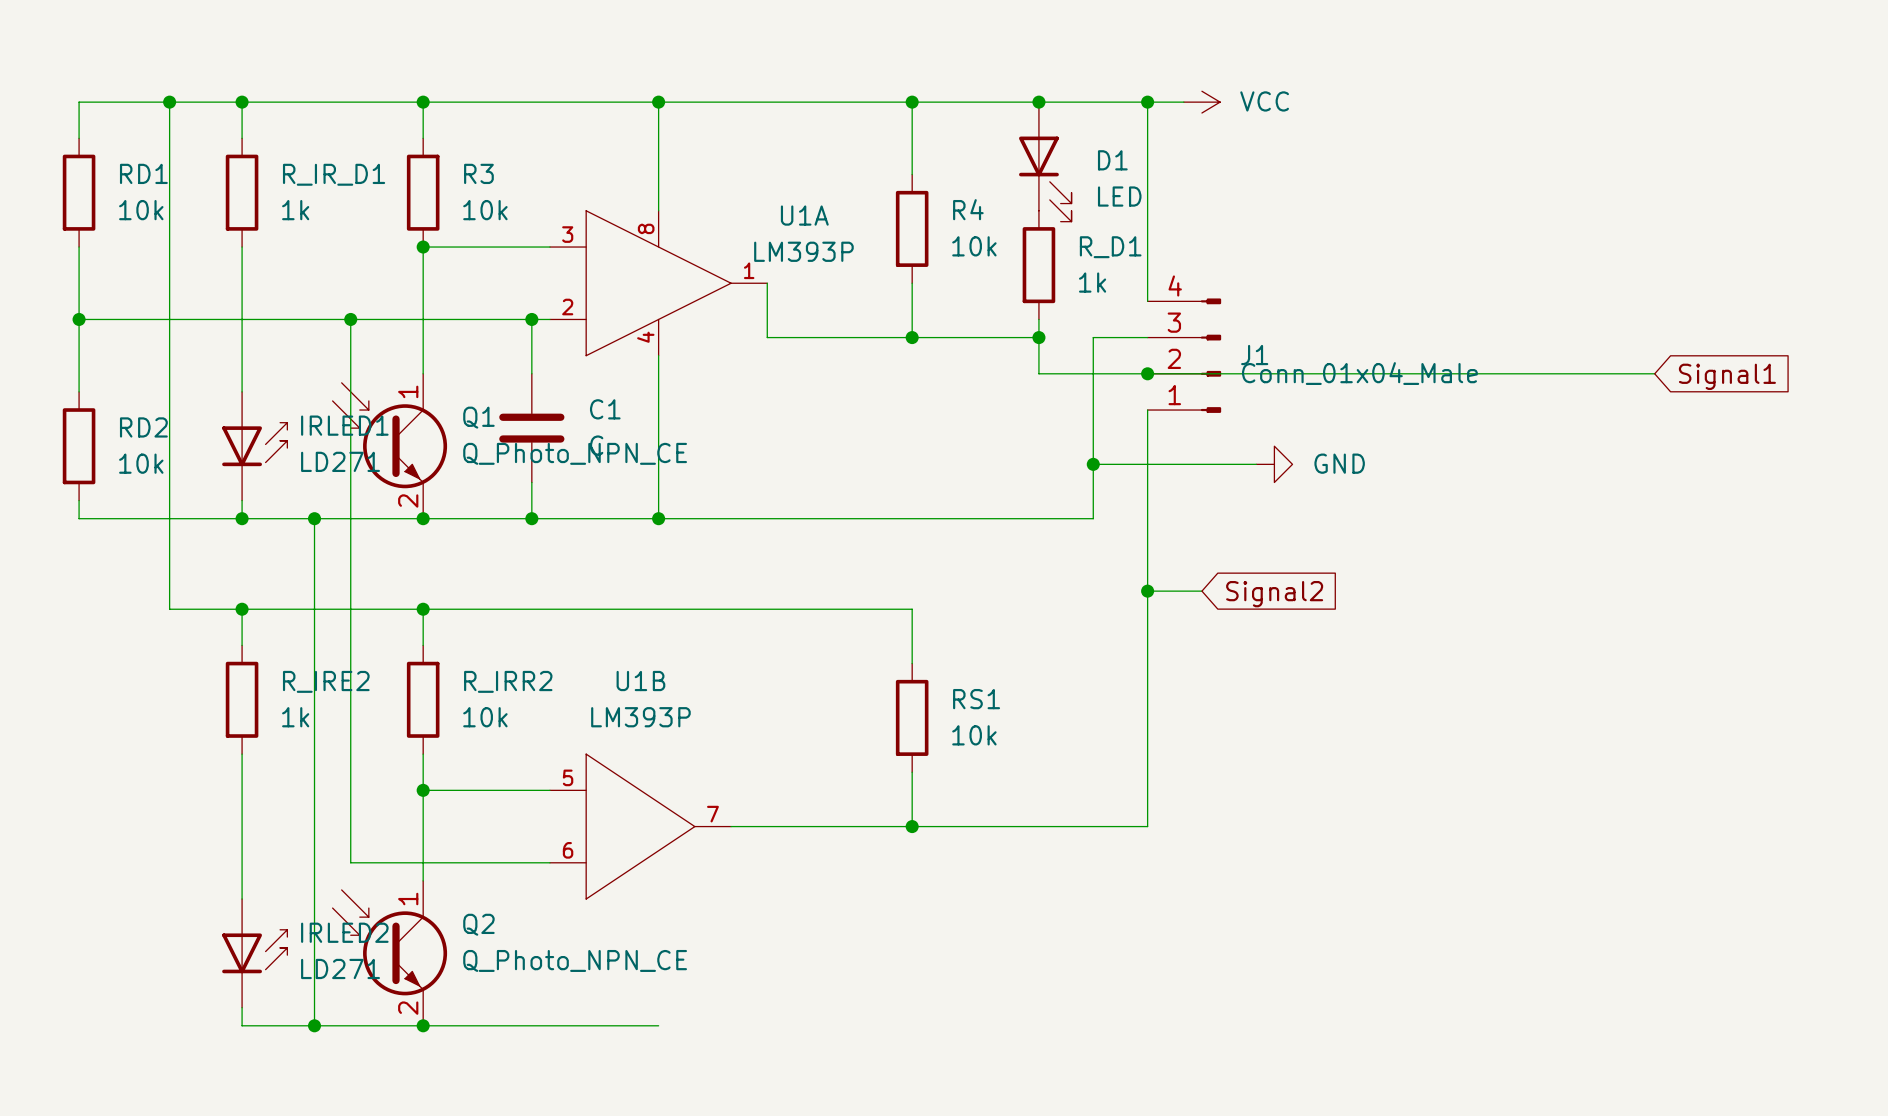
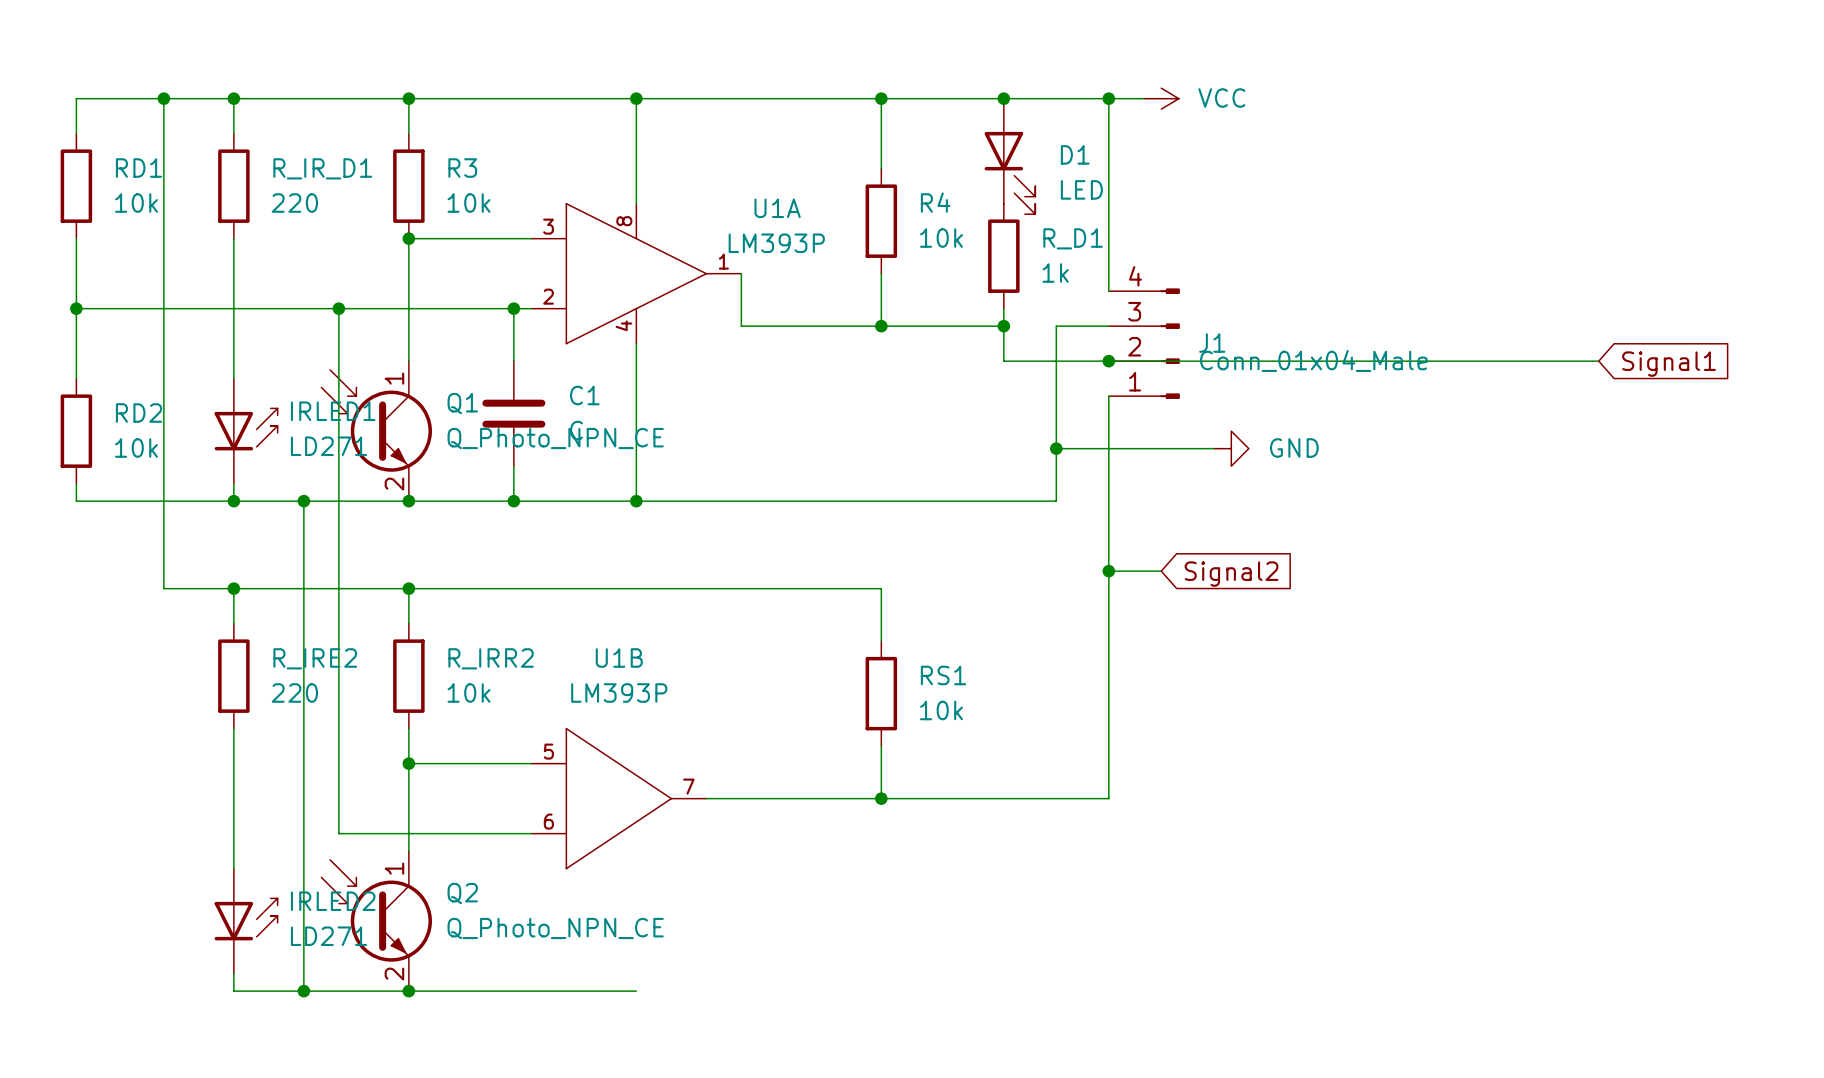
R_IR_D1 value: 1k (295, 210) -> 220 (294, 203)
R_IRE2 value: 1k (295, 717) -> 220 (294, 692)

